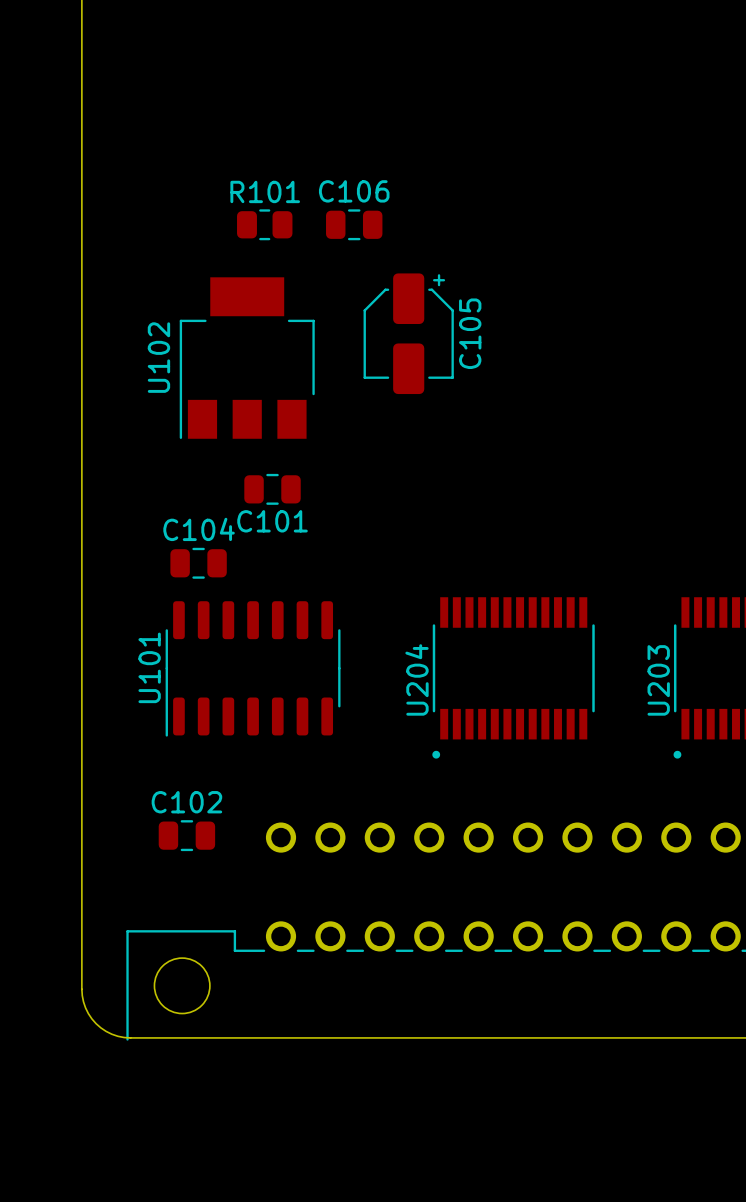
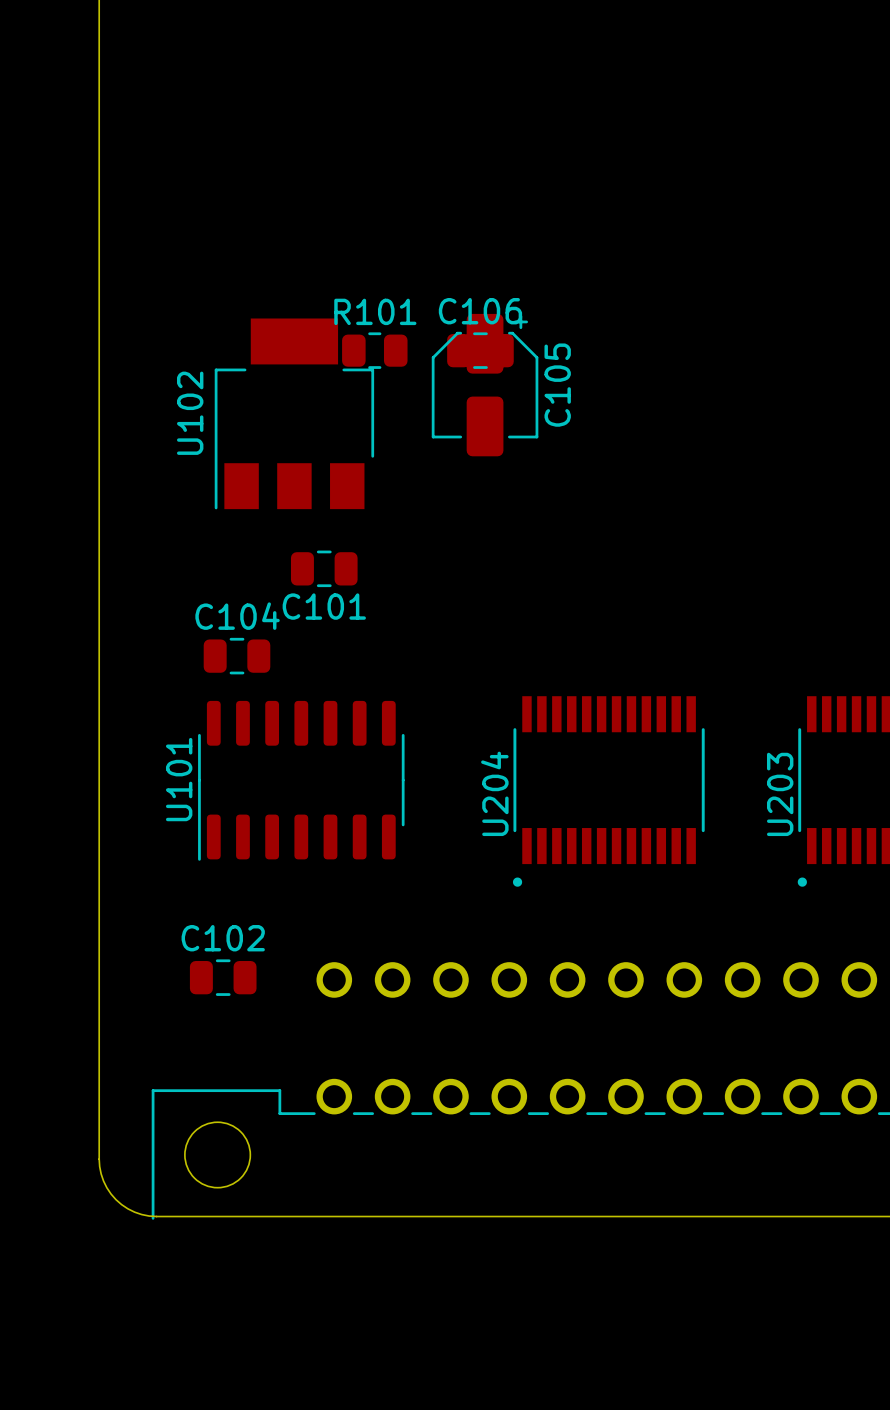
R101 position: (264, 224) -> (374, 350)
C106 position: (354, 224) -> (480, 350)

